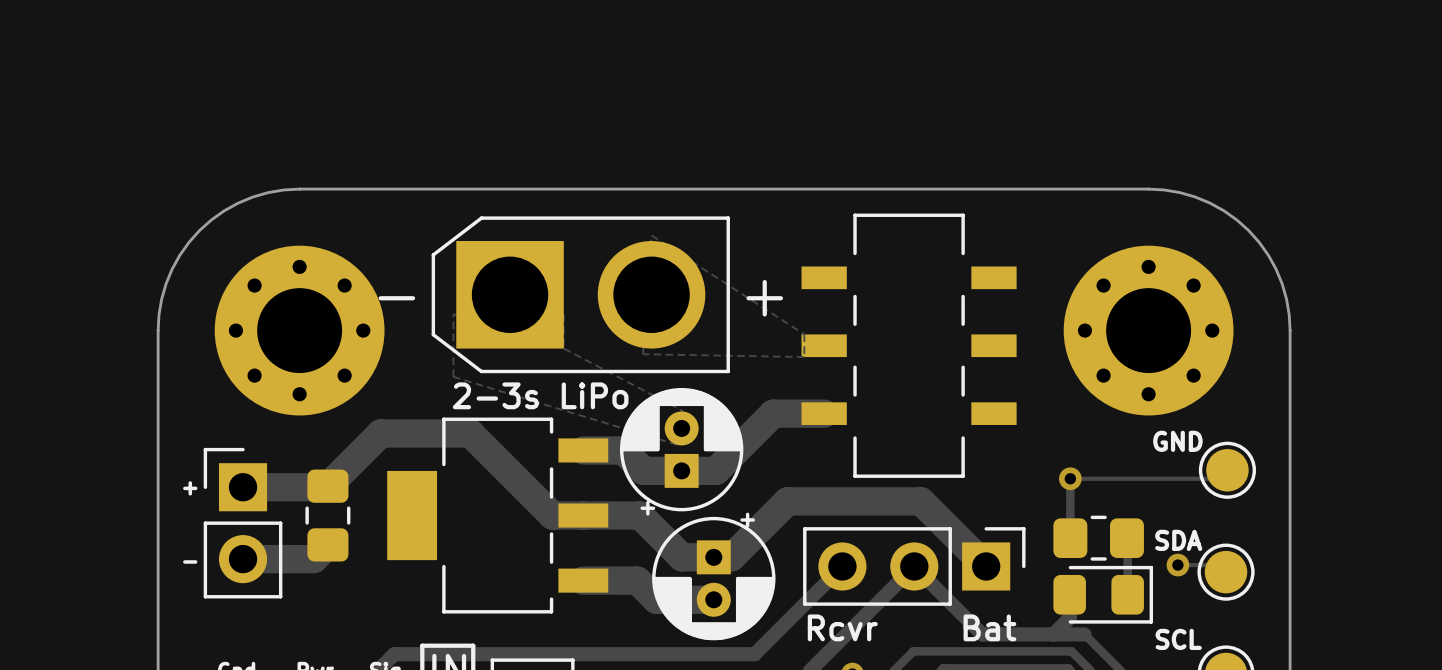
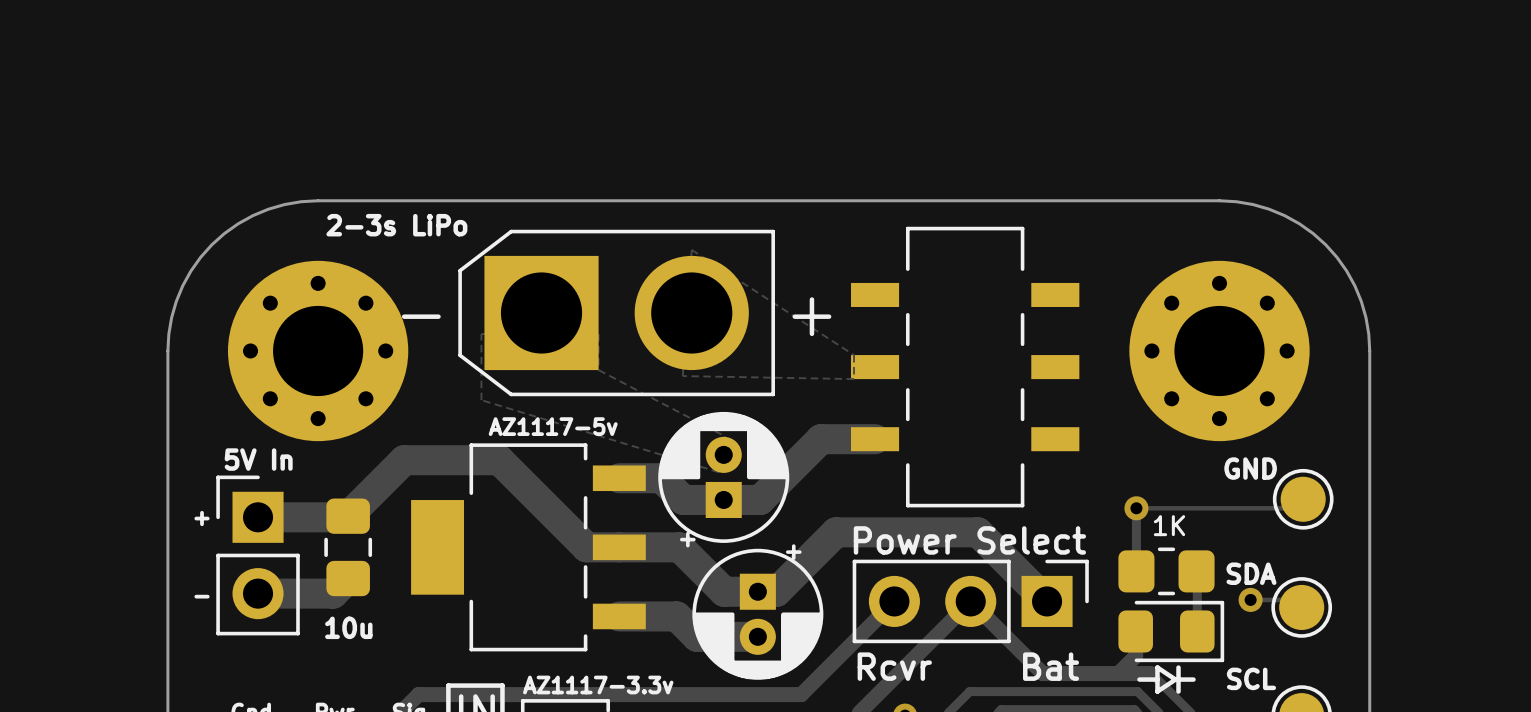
text: none -> 2-3s LiPo (396, 225)
text: 2-3s LiPo (540, 395) -> AZ1117-5v (553, 426)
text: none -> 5V In (258, 459)
text: none -> 1K (1169, 525)
text: none -> Power Select (969, 540)
text: none -> 10u (348, 627)
line: none -> (1157, 667) (1157, 691) (1175, 679) (1157, 667)
line: none -> (1178, 667) (1178, 691)
line: none -> (1139, 679) (1157, 679)
line: none -> (1178, 679) (1193, 679)
text: none -> AZ1117-3.3v (598, 685)

